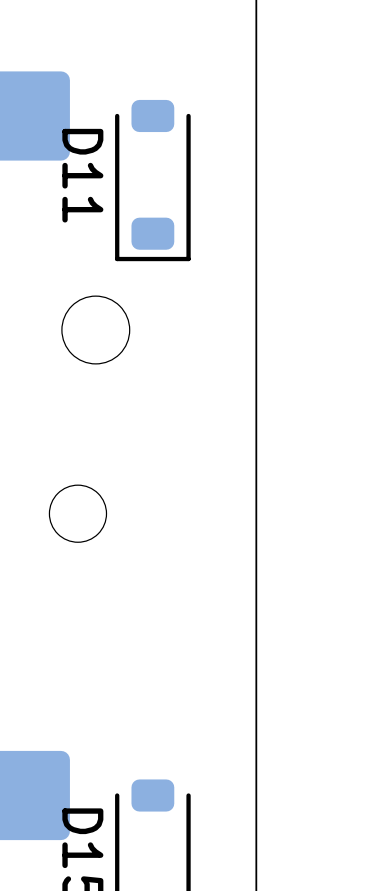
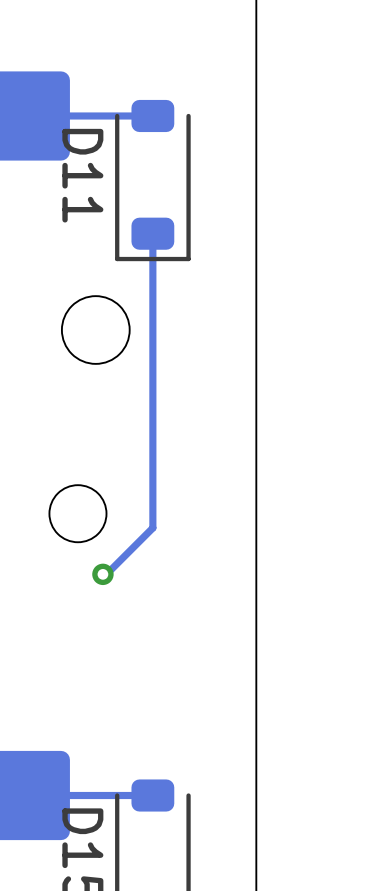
track: none -> (152, 115) (24, 115)
track: none -> (152, 233) (152, 527) (106, 574) (102, 574)
via: none -> (102, 574)
track: none -> (156, 795) (24, 795)

